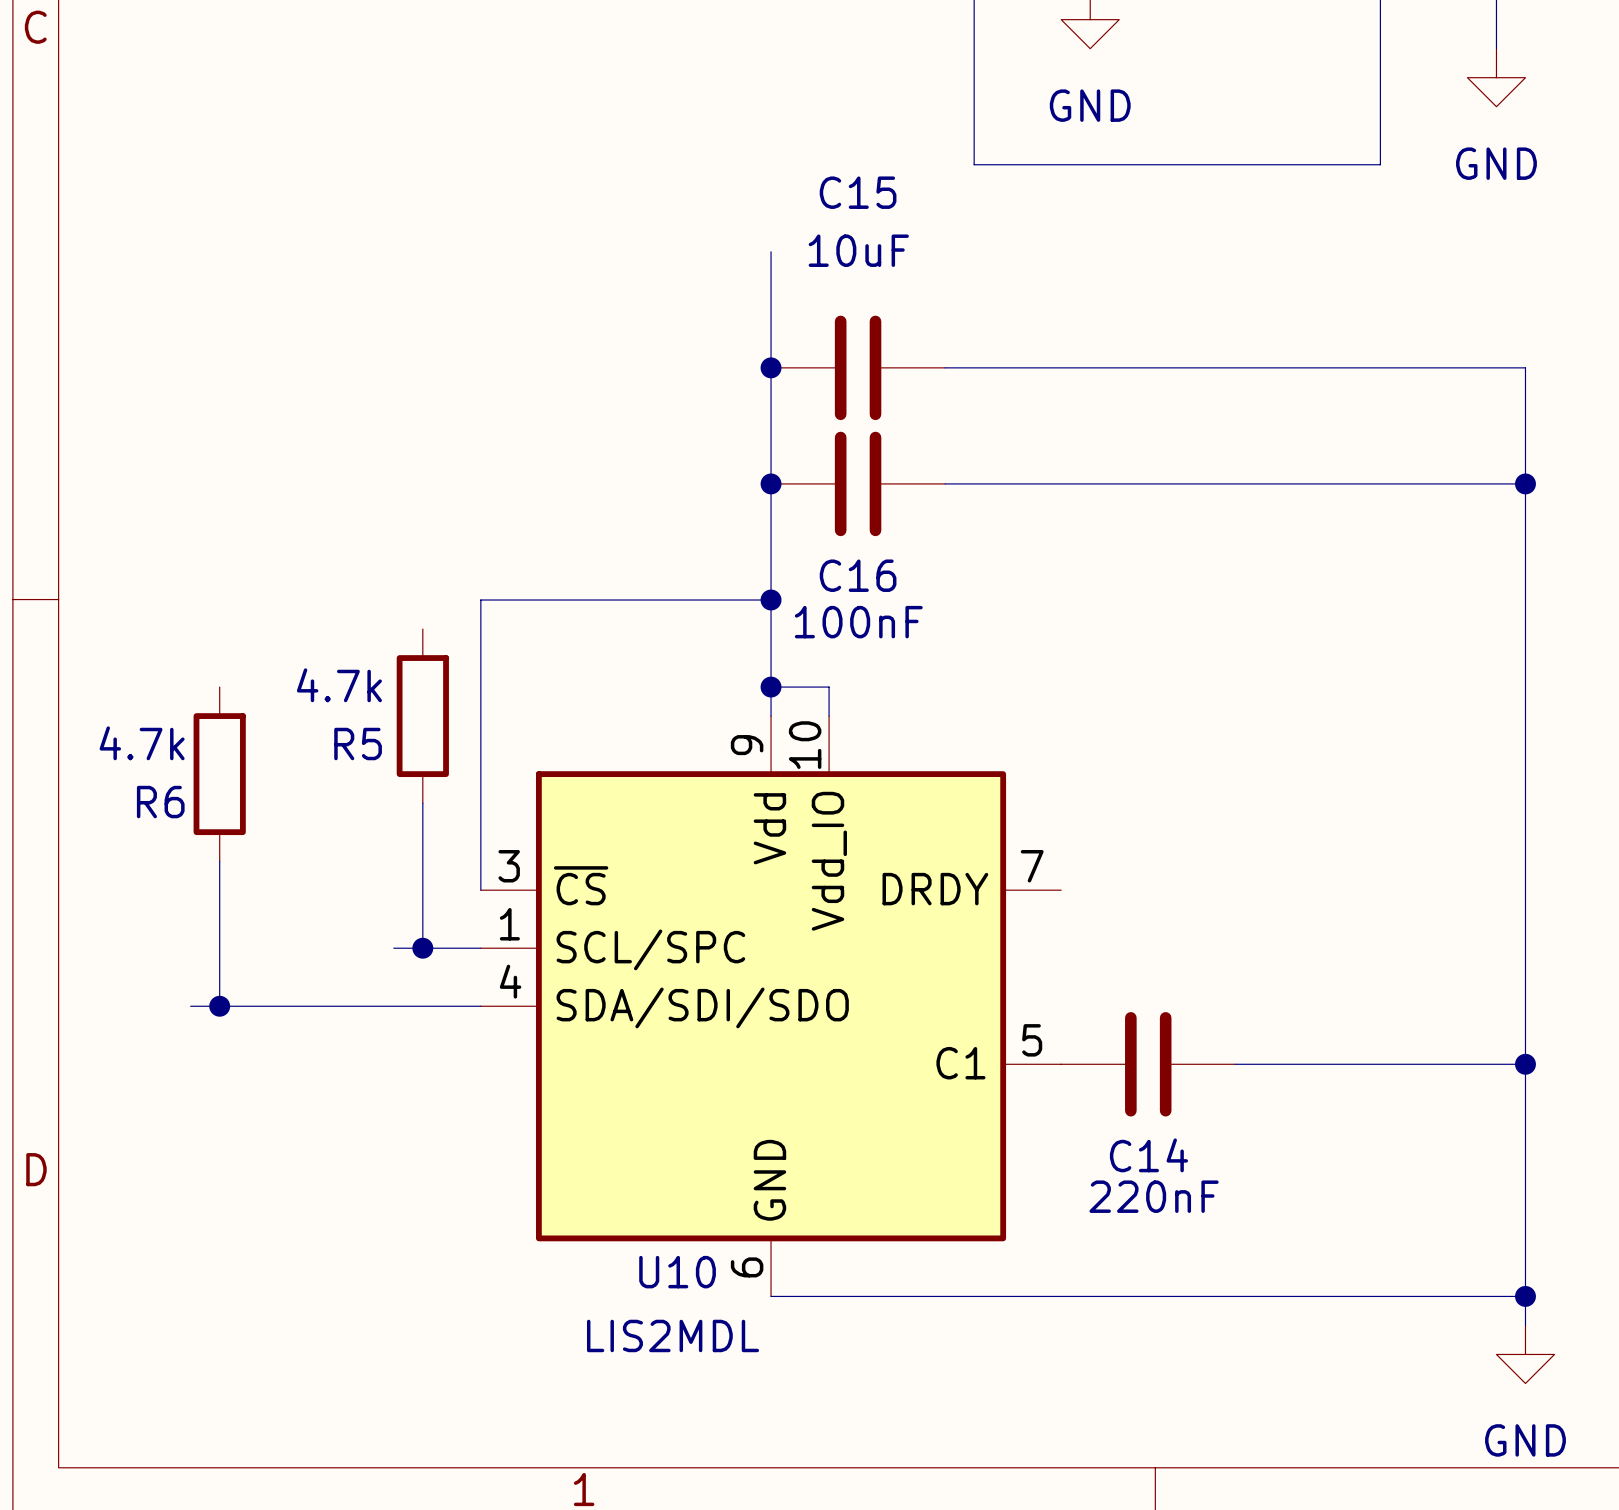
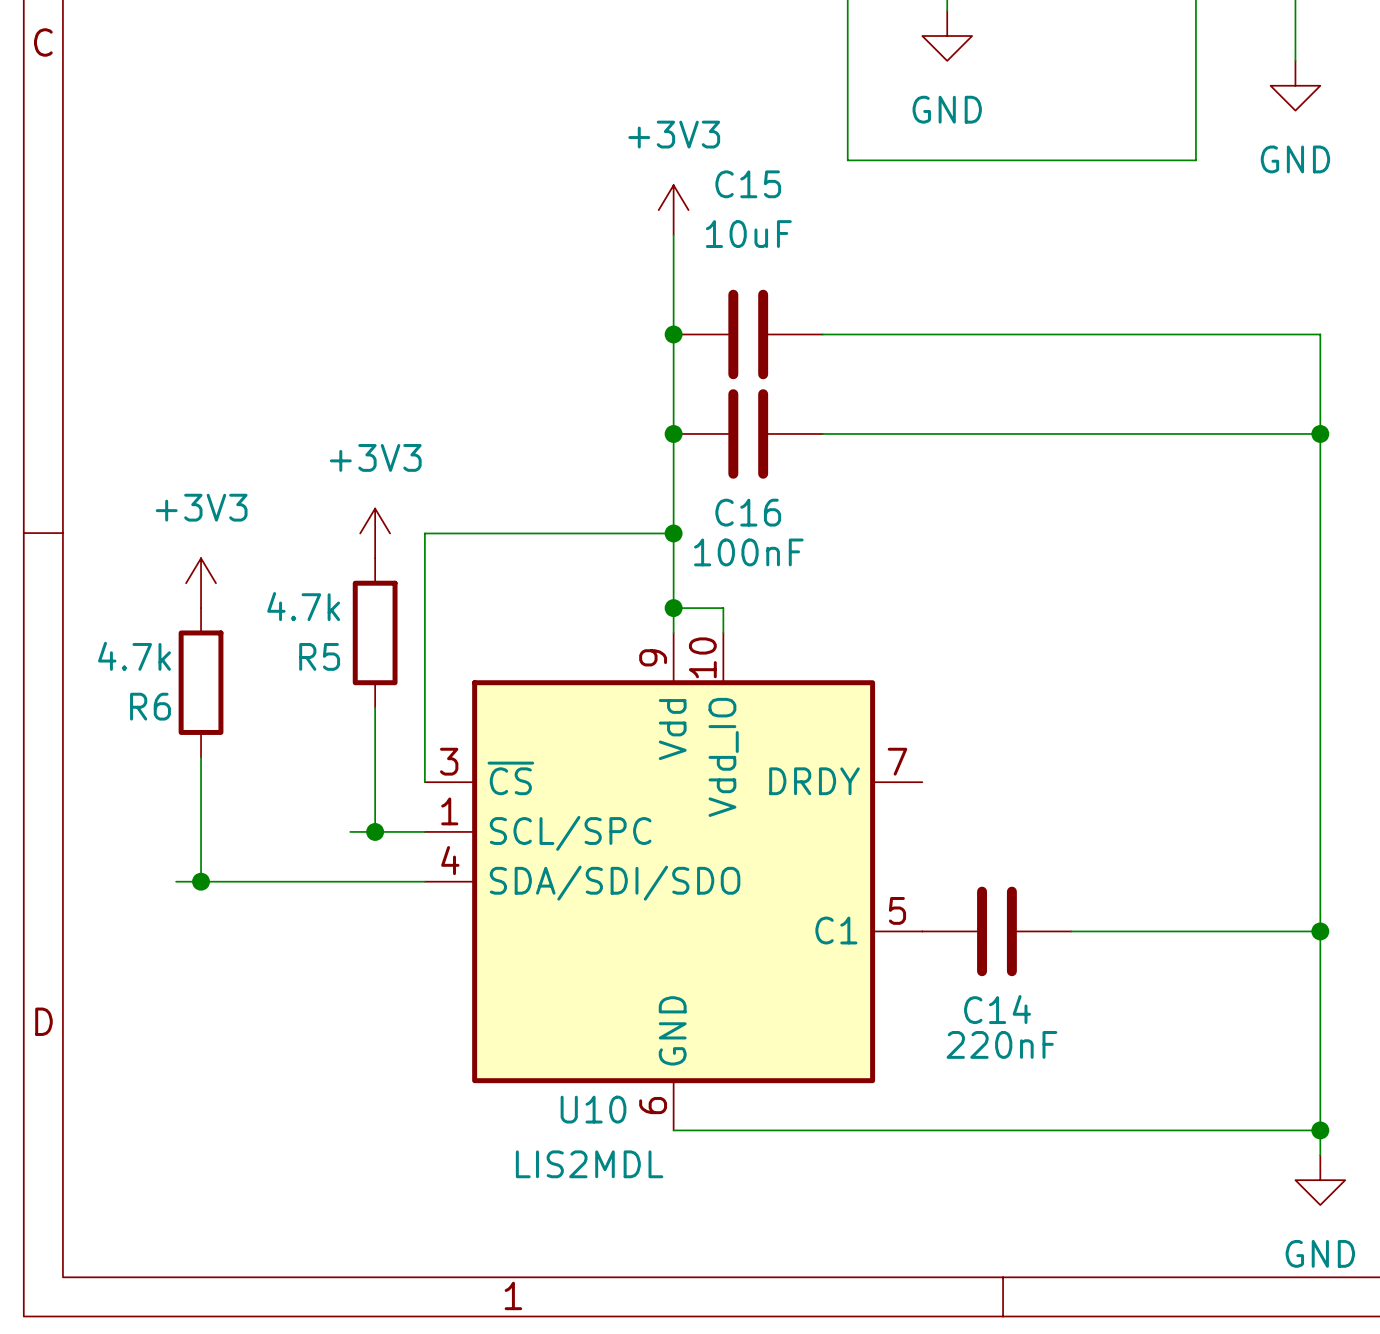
power symbol: none -> +3V3 (673, 210)
power symbol: none -> +3V3 (375, 533)
power symbol: none -> +3V3 (201, 583)

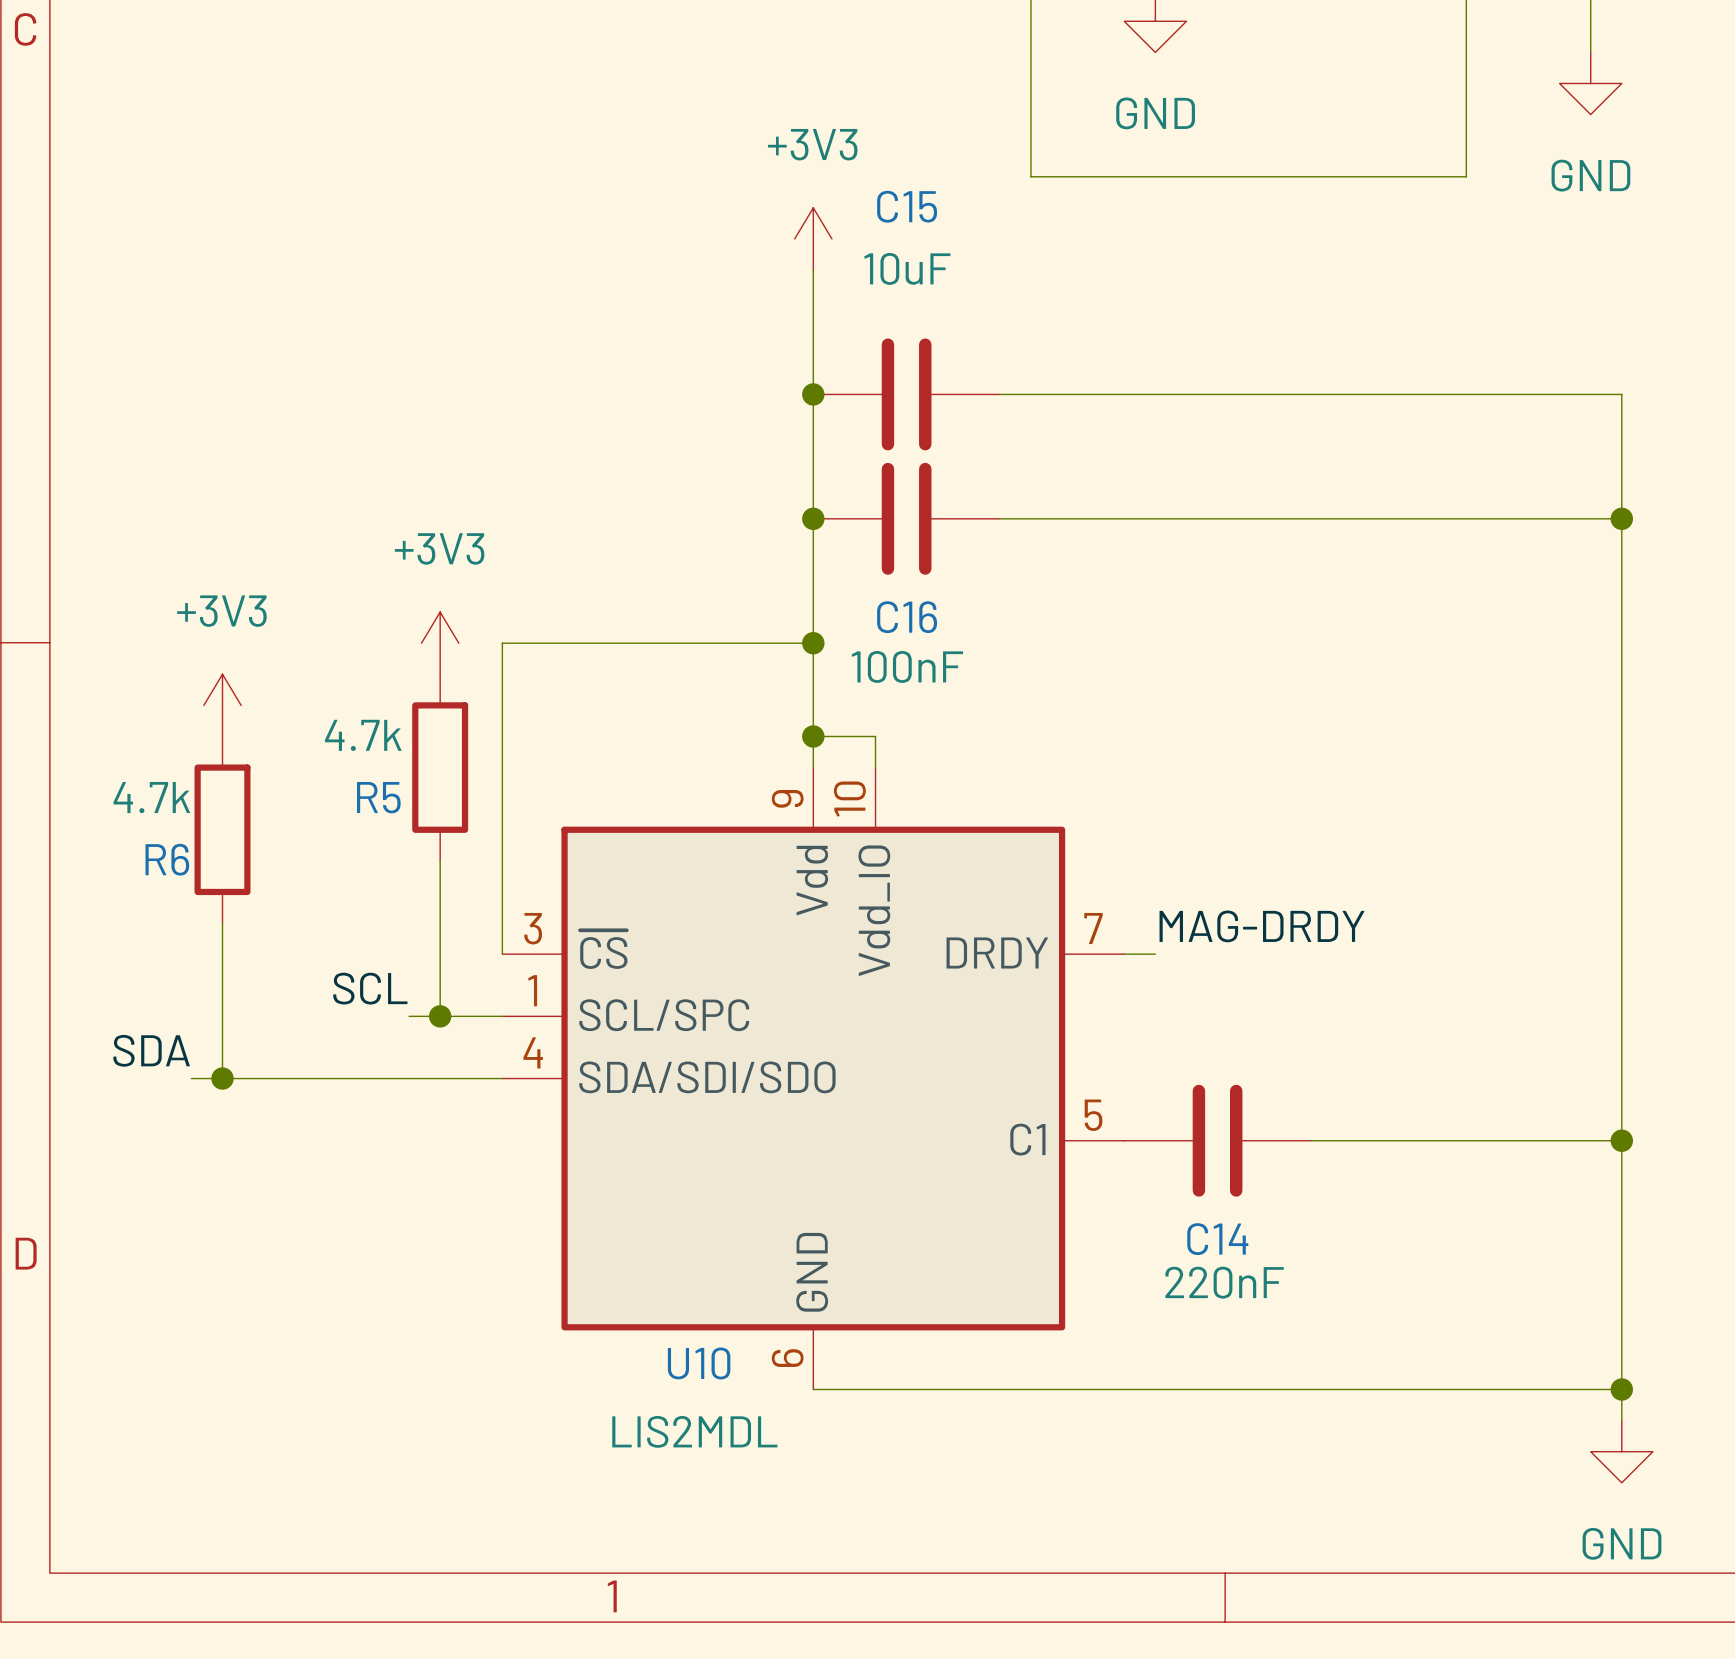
label: none -> MAG-DRDY (1262, 926)
wire: none -> (1124, 954) (1155, 954)
label: none -> SCL (370, 988)
label: none -> SDA (151, 1050)

